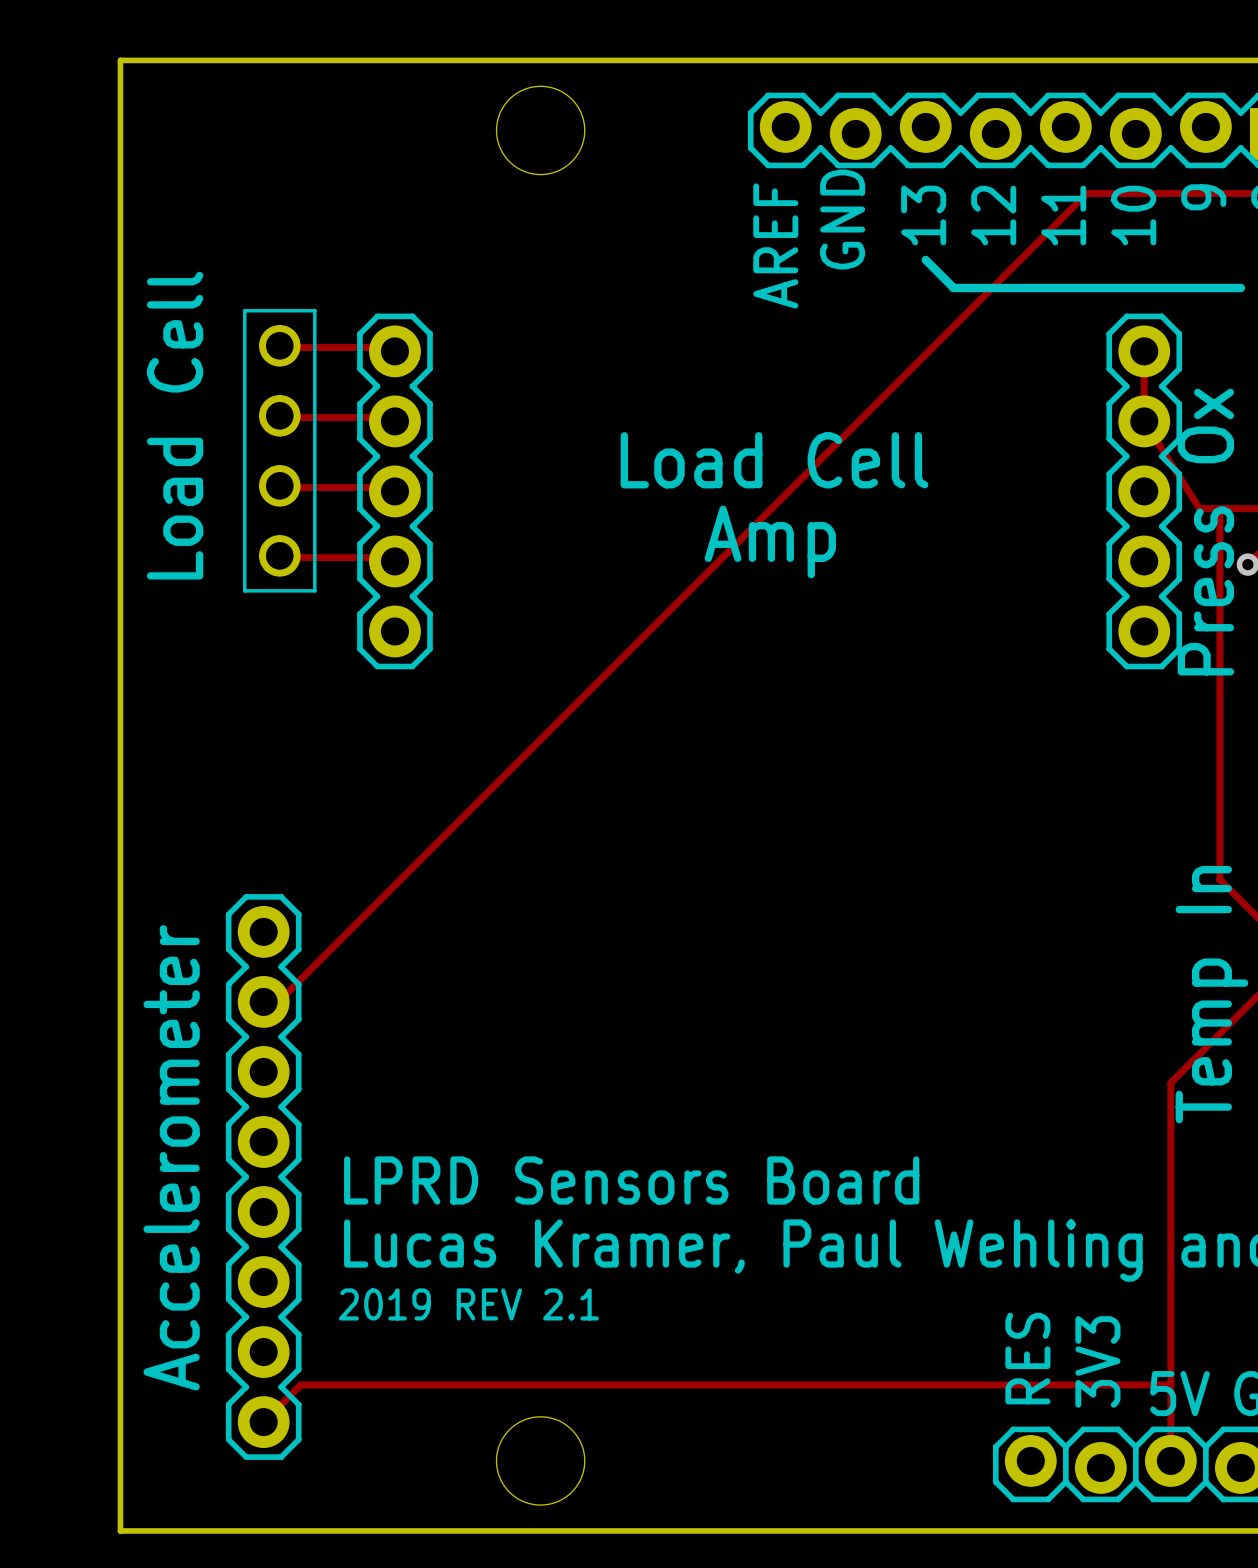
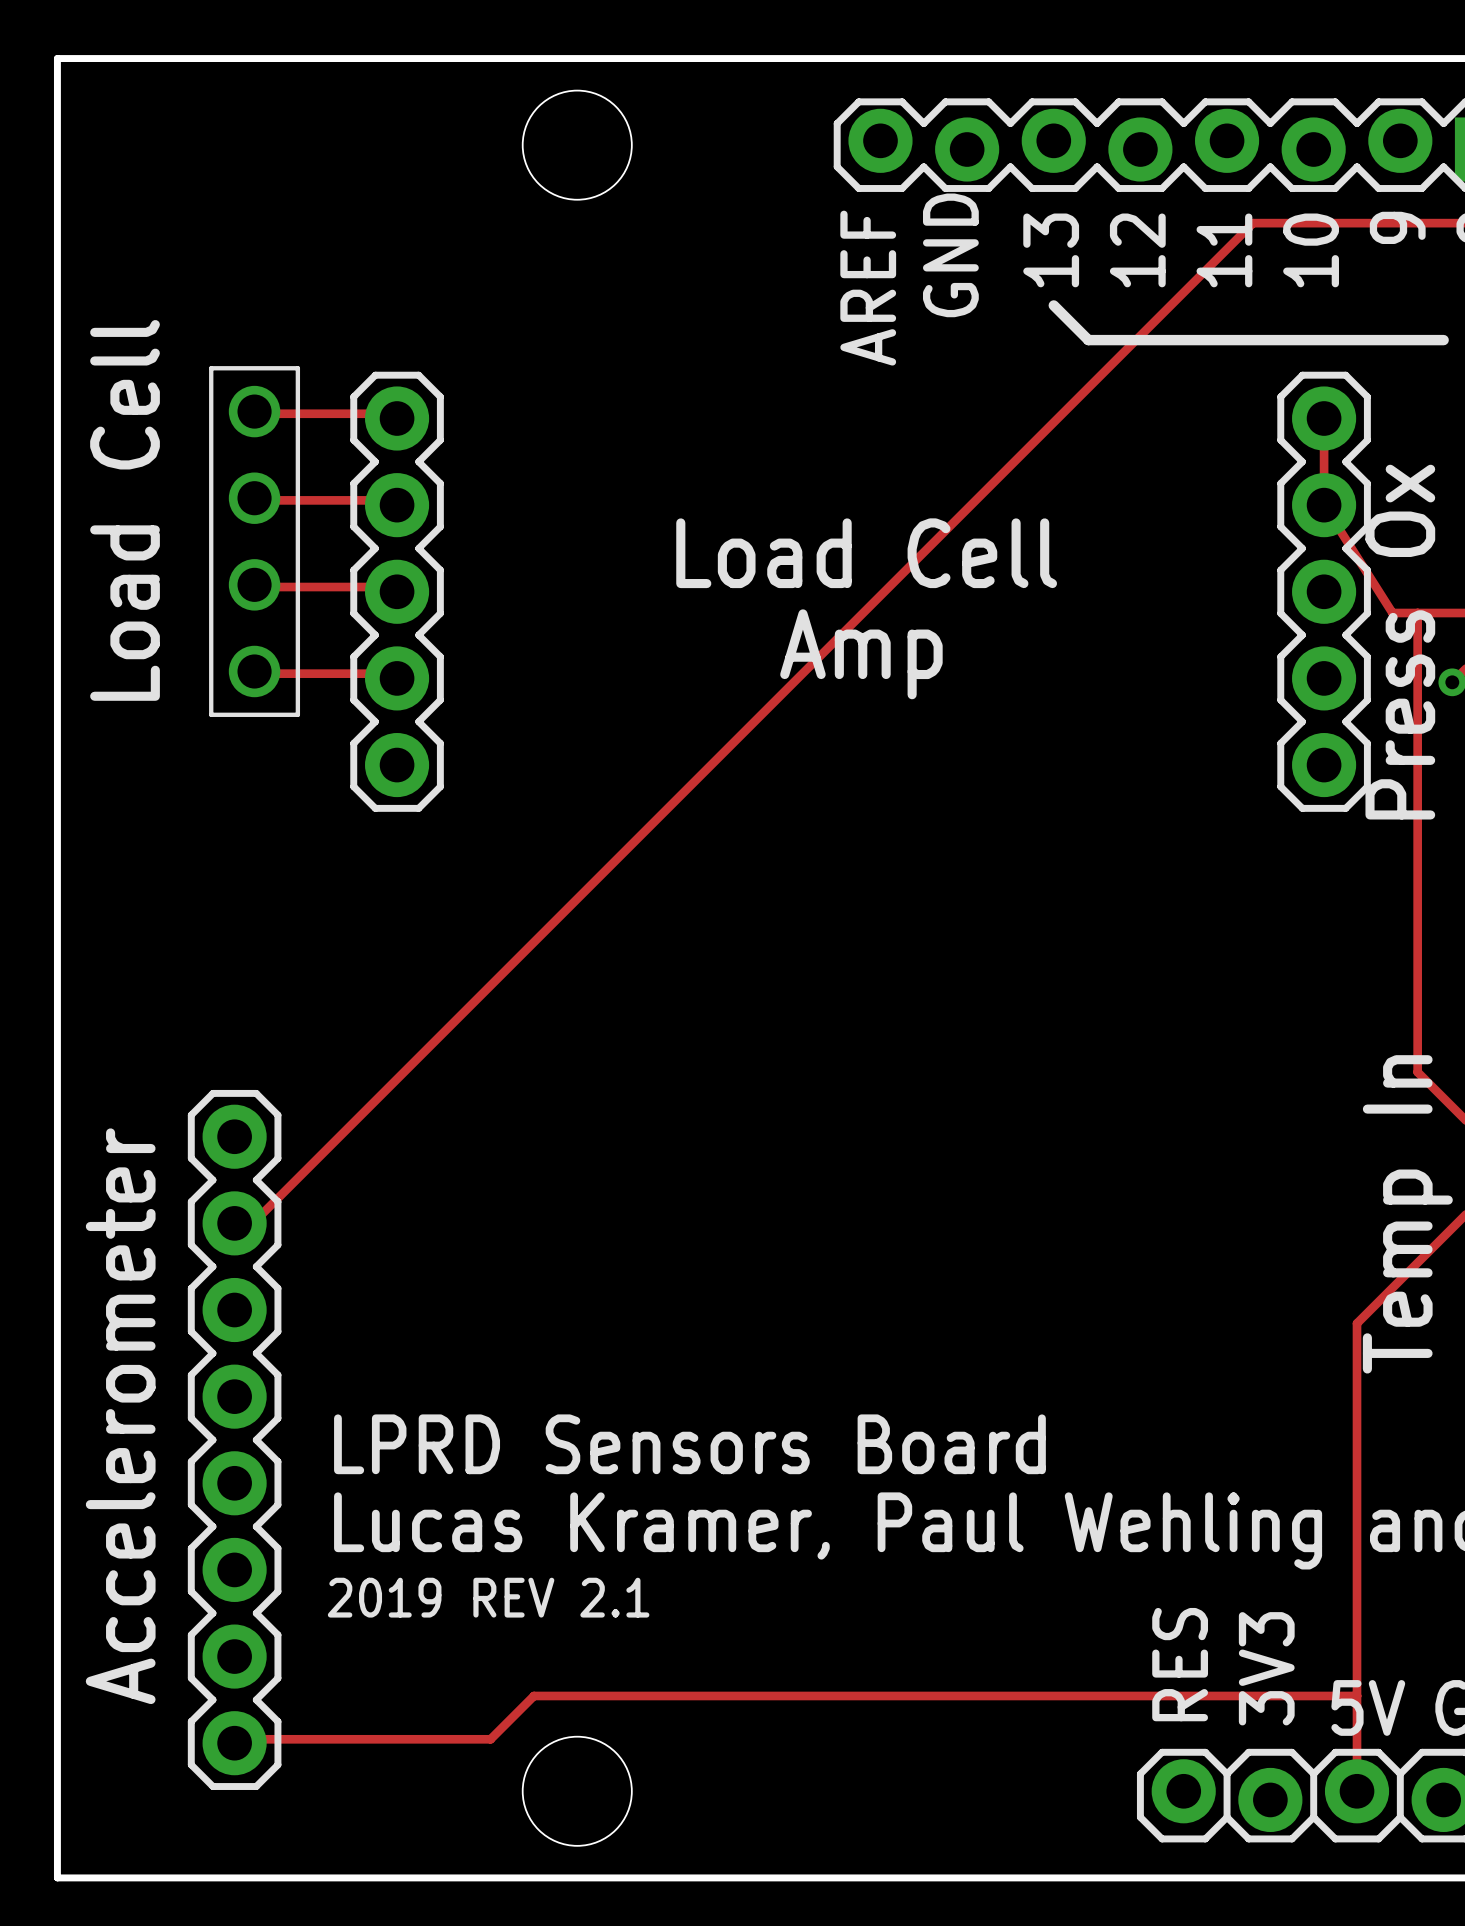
track: (1170, 1384) (300, 1384) (263, 1422) -> (1357, 1695) (533, 1695) (490, 1739) (239, 1739) (234, 1743)

